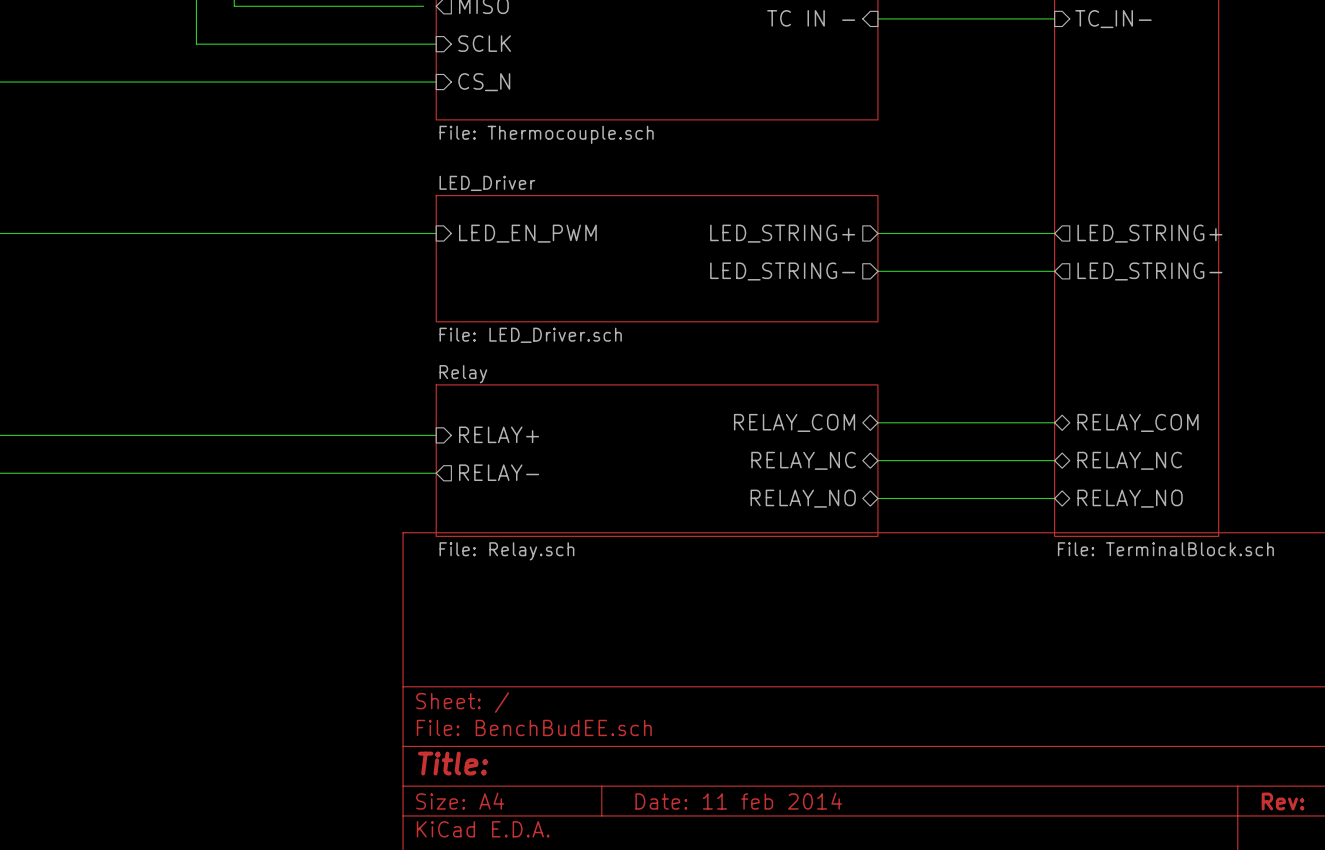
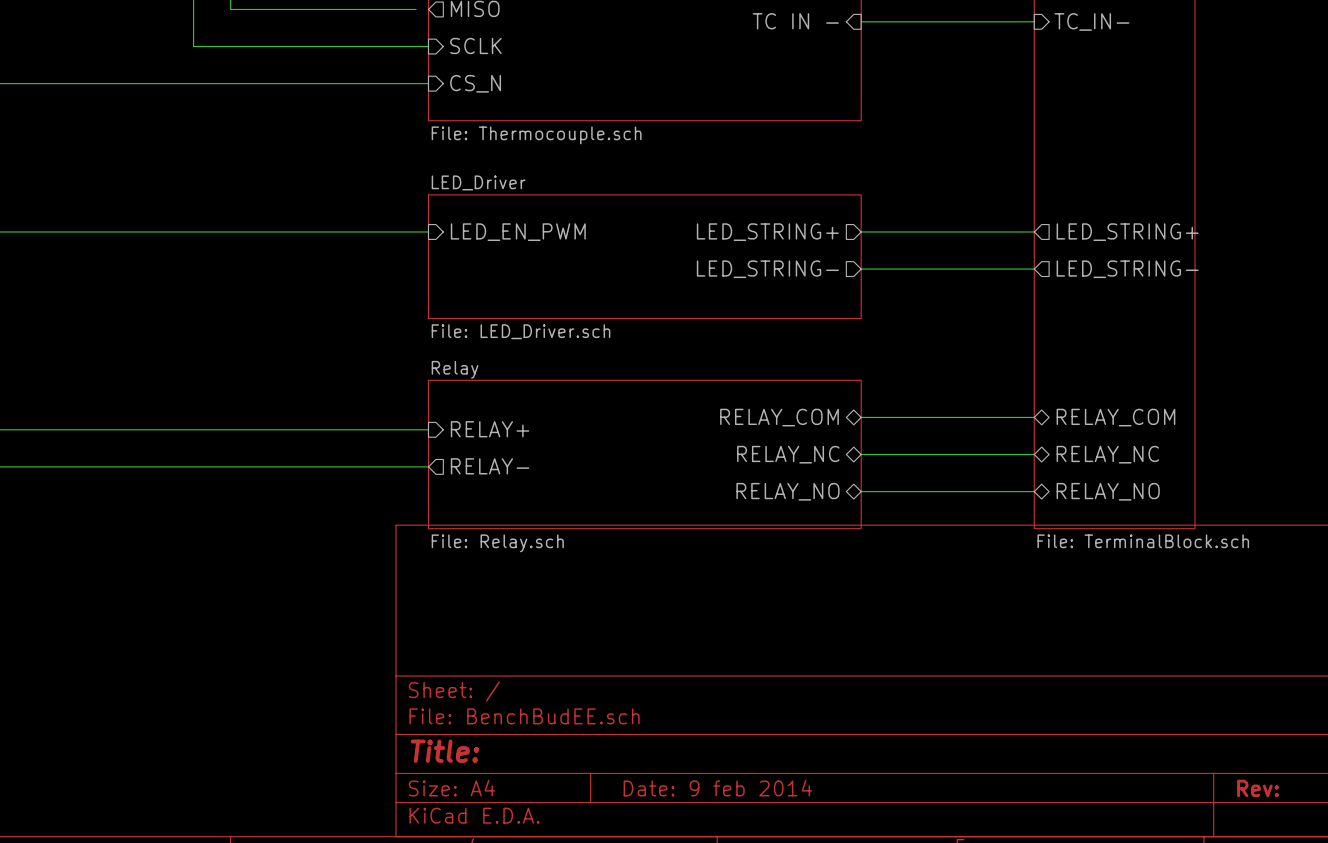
title block: Date: 11 feb 2014 (738, 801) -> Date: 9 feb 2014 (717, 788)

